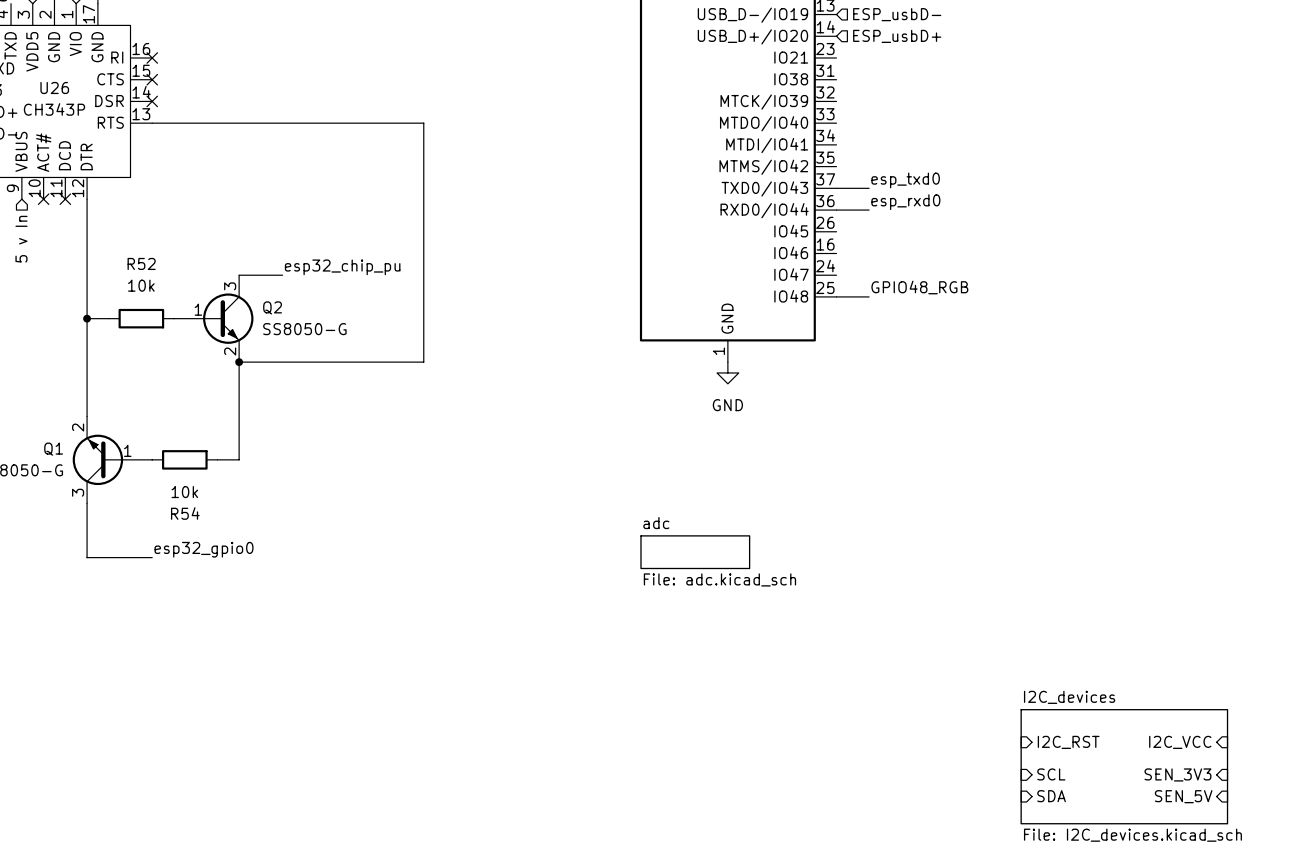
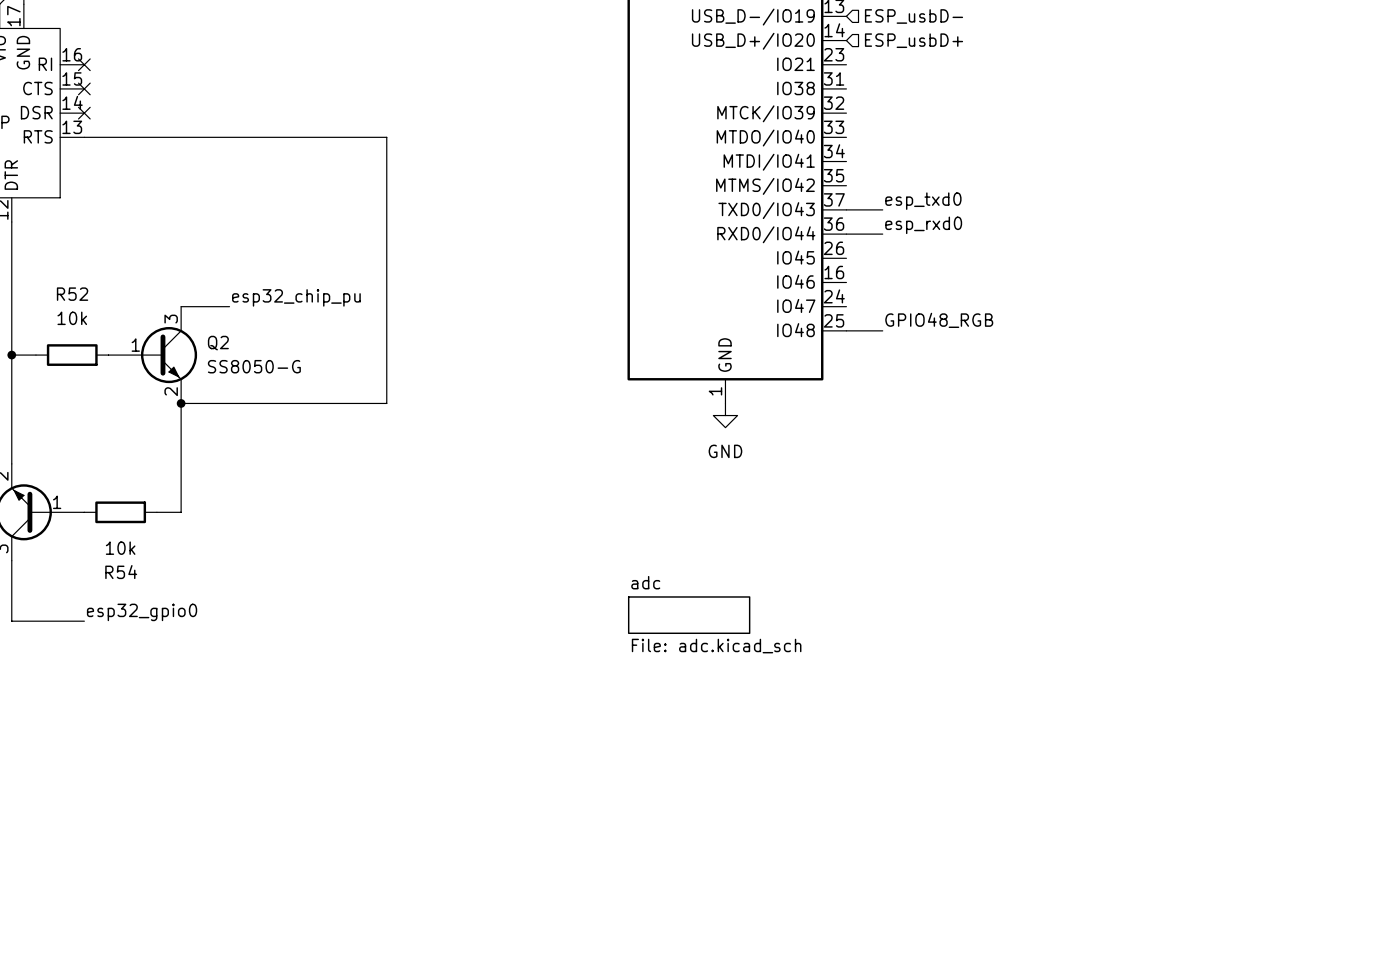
sheet pin: I2C_RST (1068, 742) -> none
sheet pin: I2C_VCC (1180, 742) -> none
sheet I2C_devices: File: I2C_devices.kicad_sch (1124, 766) -> none
sheet pin: SCL (1051, 774) -> none
sheet pin: SEN_3V3 (1177, 774) -> none
sheet pin: SDA (1051, 796) -> none
sheet pin: SEN_5V (1183, 796) -> none

